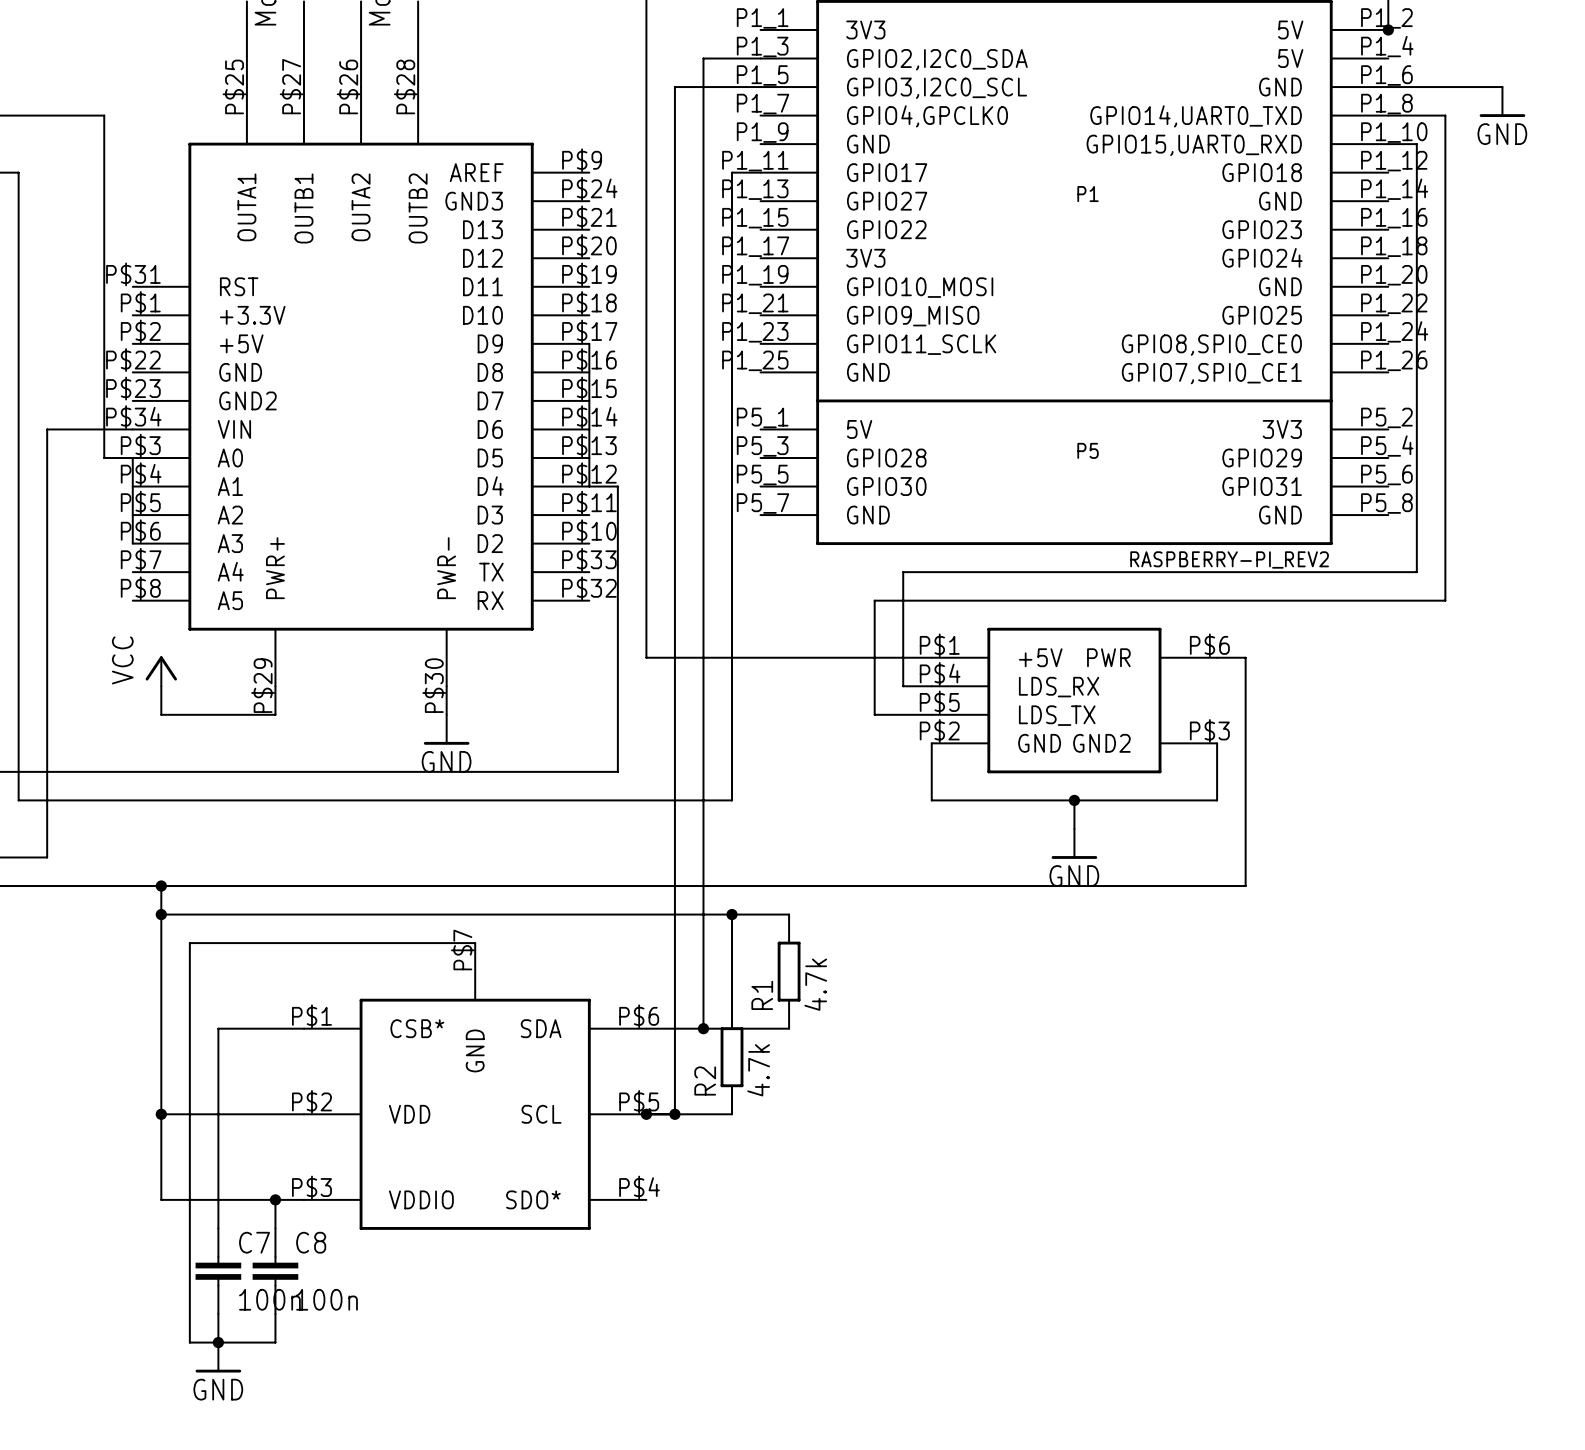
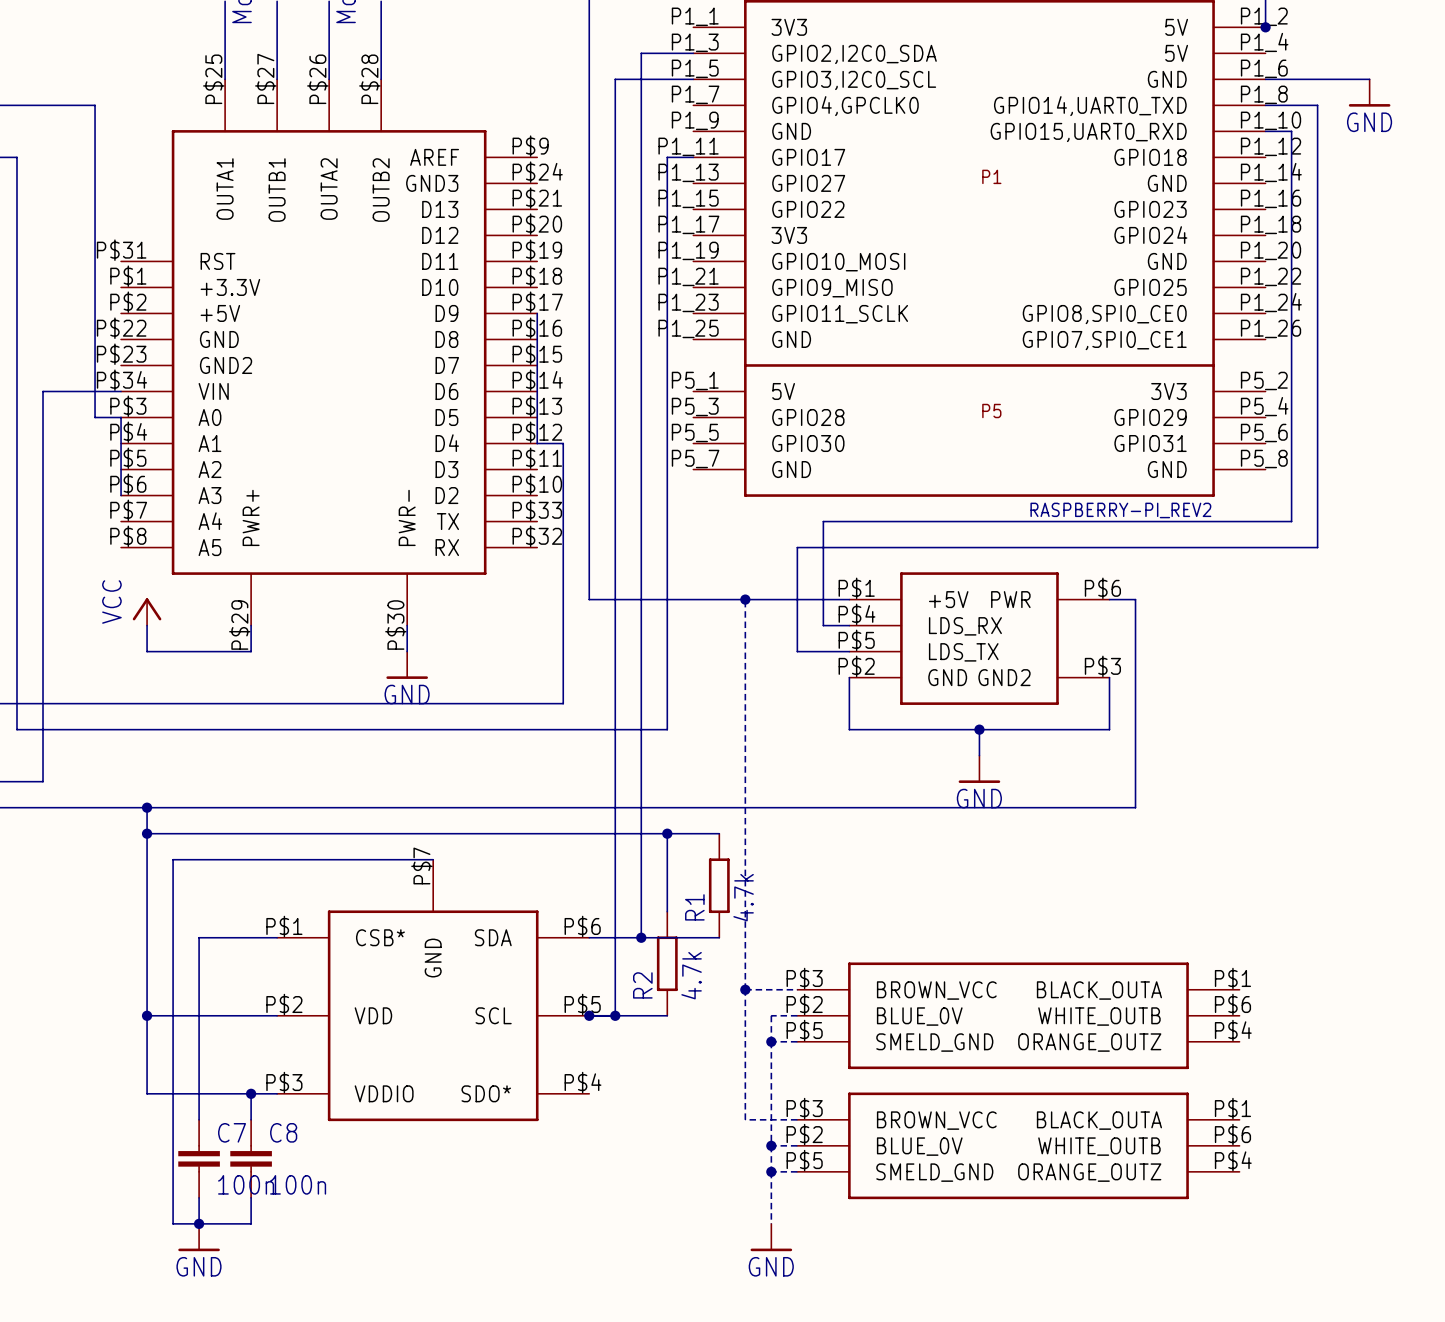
wire: none -> (745, 599) (745, 1119) (797, 1119)
junction: none -> (745, 599)
wire: none -> (745, 989) (797, 989)
junction: none -> (745, 989)
wire: none -> (797, 1015) (771, 1015) (771, 1223)
part: none -> (1018, 1015)
wire: none -> (771, 1041) (797, 1041)
junction: none -> (771, 1041)
wire: none -> (771, 1145) (797, 1145)
junction: none -> (771, 1145)
part: none -> (1018, 1145)
wire: none -> (771, 1171) (797, 1171)
junction: none -> (771, 1171)
power symbol: none -> GND (771, 1237)

